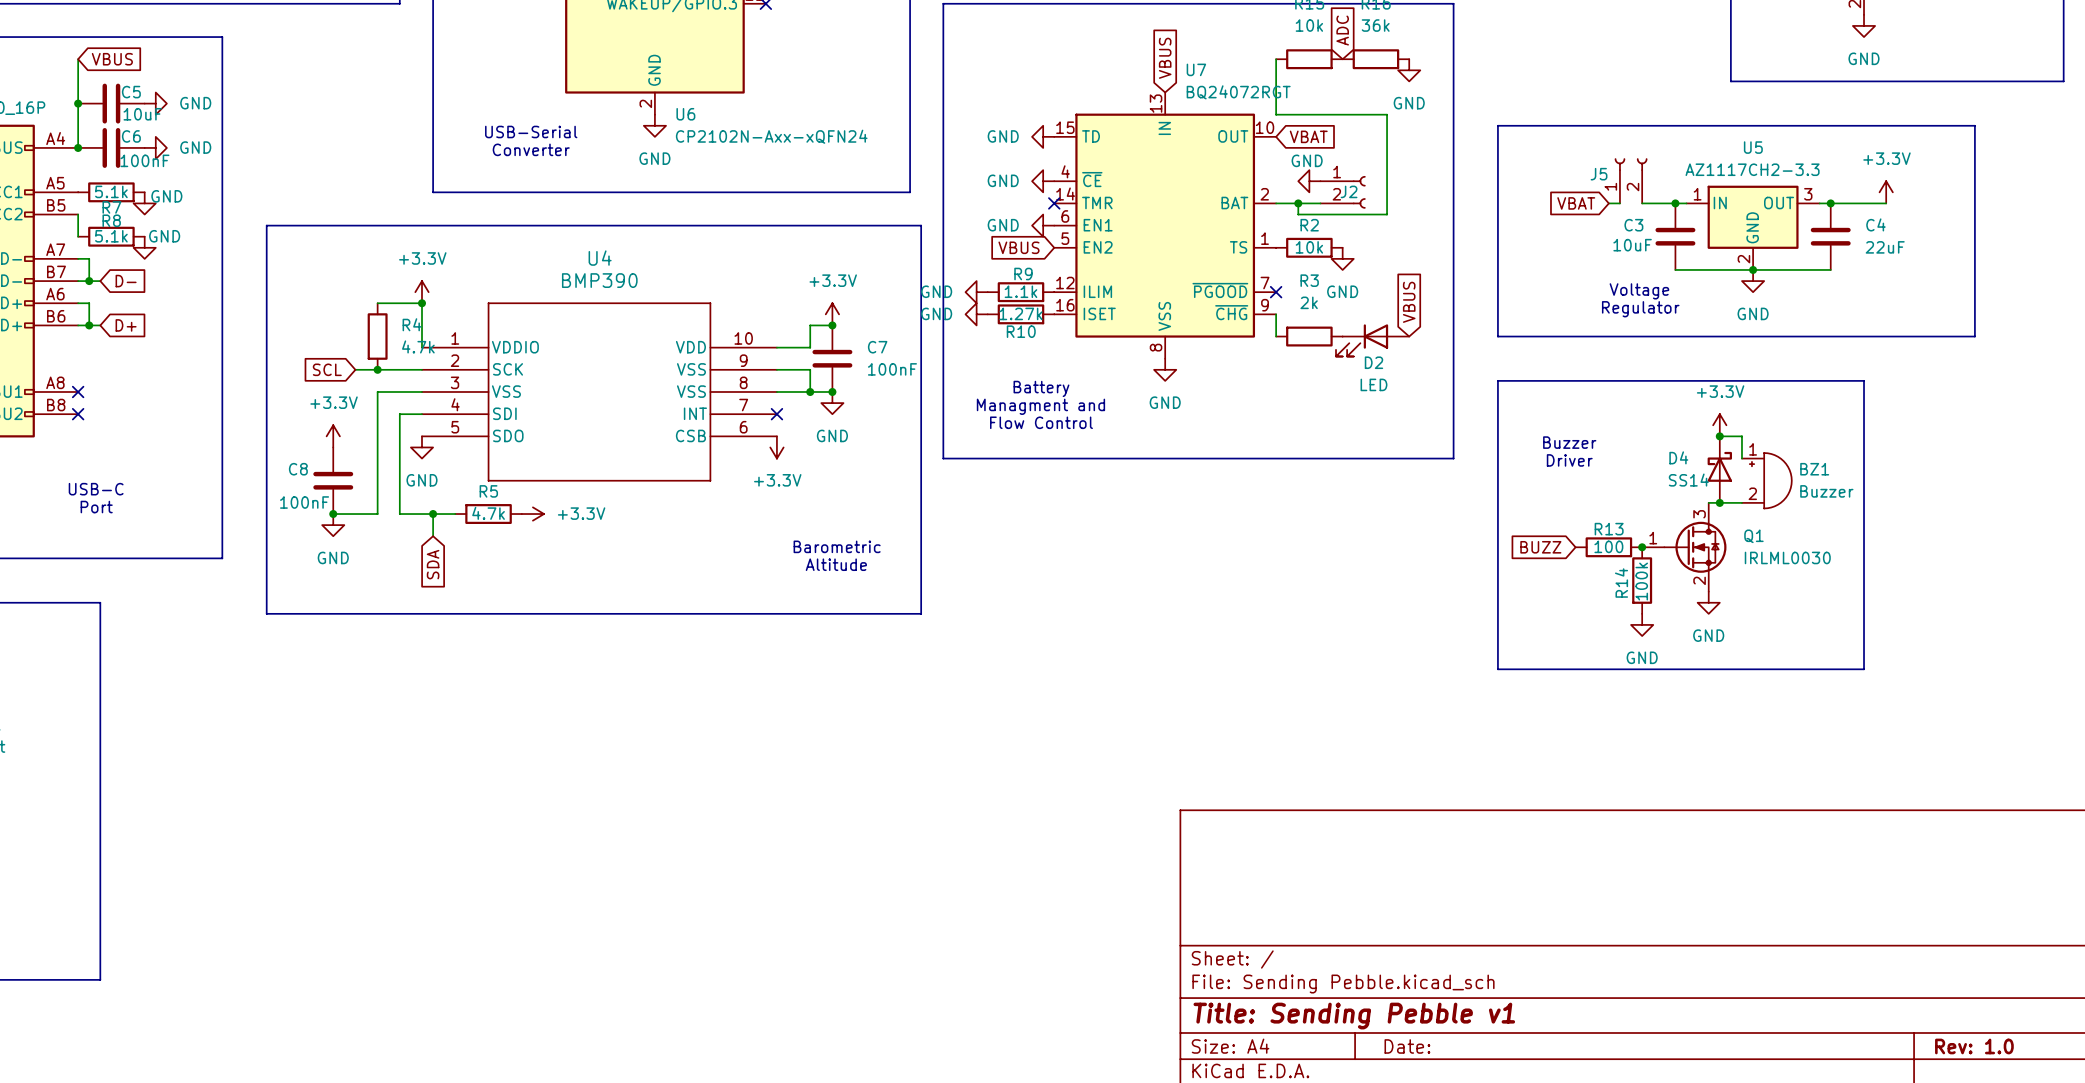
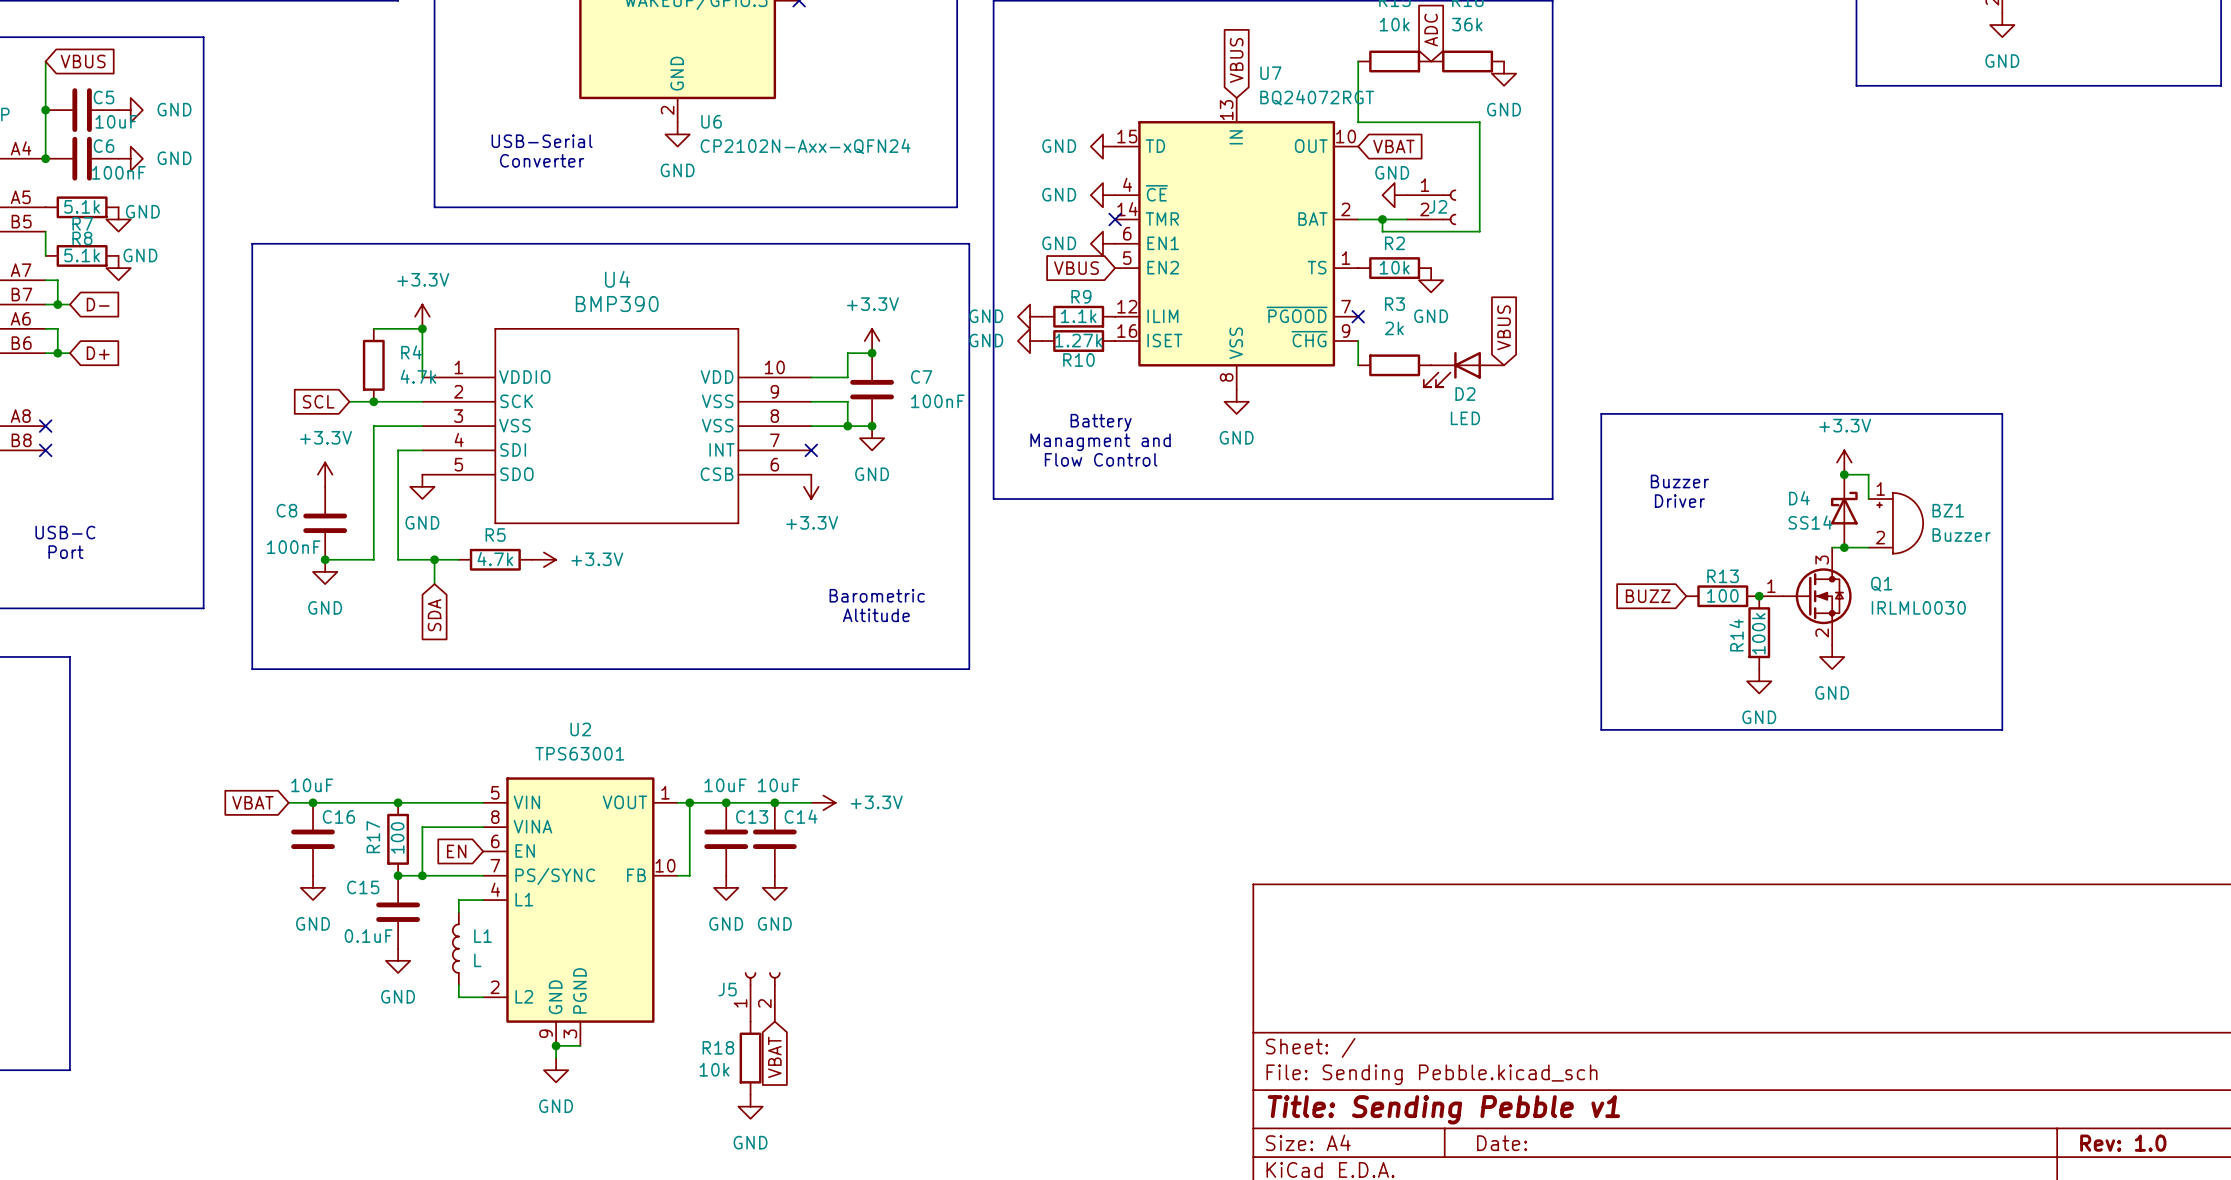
line: (1497, 125) (1974, 125) (1974, 336) (1497, 336) (1497, 125) -> none
J5 position: (1631, 180) -> (762, 996)
power symbol: +3.3V (1886, 192) -> none
global label: VBAT (1576, 203) -> none
wire: (1608, 203) (1619, 203) -> none
wire: (1642, 203) (1686, 203) -> none
junction: (1675, 203) -> none
wire: (1819, 203) (1886, 203) -> none
junction: (1830, 203) -> none
U5: AZ1117CH2-3.3 (1753, 227) -> none
C3: 10uF (1675, 236) -> none
C4: 22uF (1830, 236) -> none
wire: (1675, 269) (1830, 269) -> none
junction: (1753, 269) -> none
power symbol: GND (1753, 281) -> none
text: Voltage (1639, 291) -> none
text: Regulator (1640, 309) -> none
global label: none -> VBAT (252, 802)
wire: none -> (288, 802) (483, 802)
junction: none -> (313, 802)
junction: none -> (398, 802)
wire: none -> (677, 802) (811, 802)
wire: none -> (689, 802) (689, 875) (677, 875)
junction: none -> (689, 802)
junction: none -> (726, 802)
junction: none -> (774, 802)
power symbol: none -> +3.3V (823, 802)
wire: none -> (483, 827) (422, 827) (422, 875)
C16: none -> 10uF (313, 839)
R17: none -> 100 (398, 839)
C13: none -> 10uF (726, 839)
C14: none -> 10uF (774, 839)
global label: none -> EN (456, 851)
wire: none -> (398, 875) (483, 875)
junction: none -> (398, 875)
junction: none -> (422, 875)
power symbol: none -> GND (313, 887)
power symbol: none -> GND (726, 887)
power symbol: none -> GND (774, 887)
wire: none -> (483, 900) (458, 900) (458, 912)
C15: none -> 0.1uF (398, 912)
U2: none -> TPS63001 (580, 911)
L1: none -> L (455, 948)
power symbol: none -> GND (398, 960)
wire: none -> (458, 985) (458, 997) (483, 997)
junction: none -> (556, 1045)
wire: none -> (580, 1045) (556, 1045) (556, 1058)
R18: none -> 10k (750, 1058)
global label: none -> VBAT (774, 1057)
power symbol: none -> GND (556, 1070)
power symbol: none -> GND (750, 1106)

